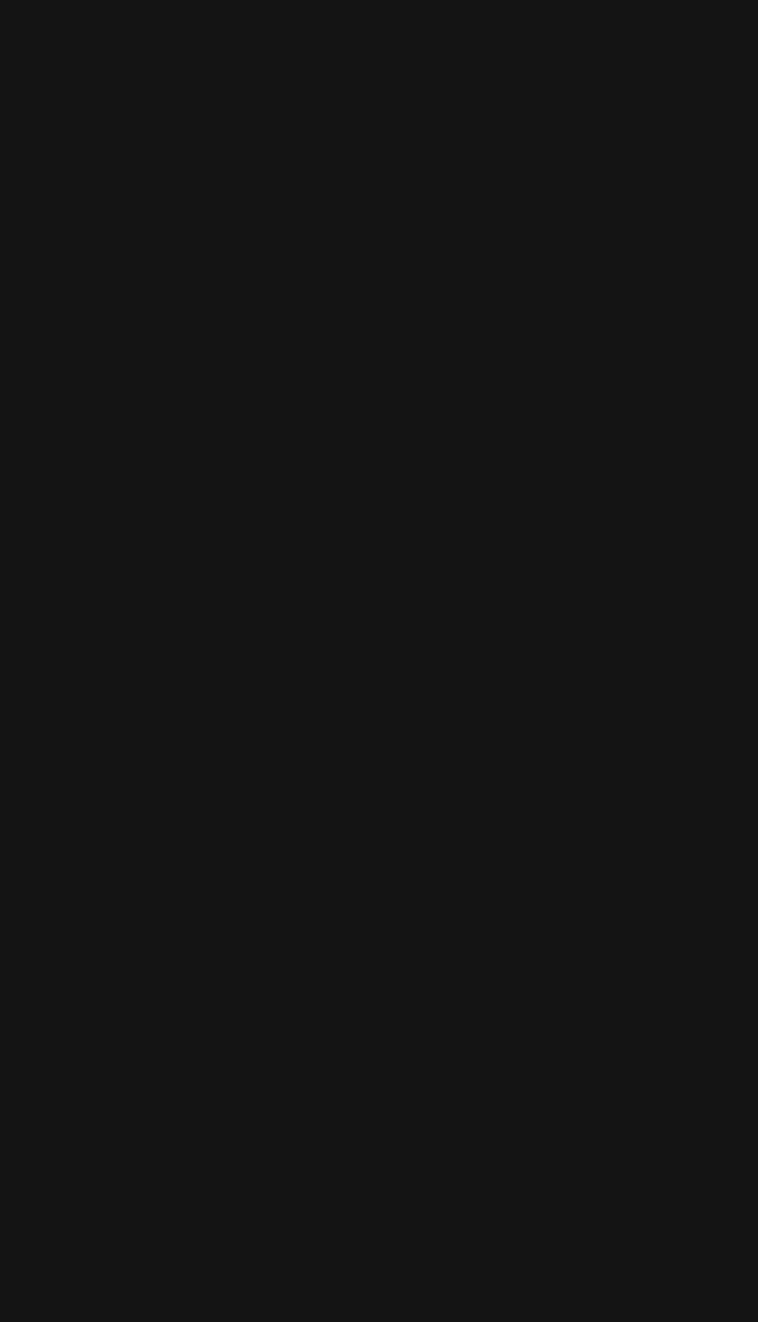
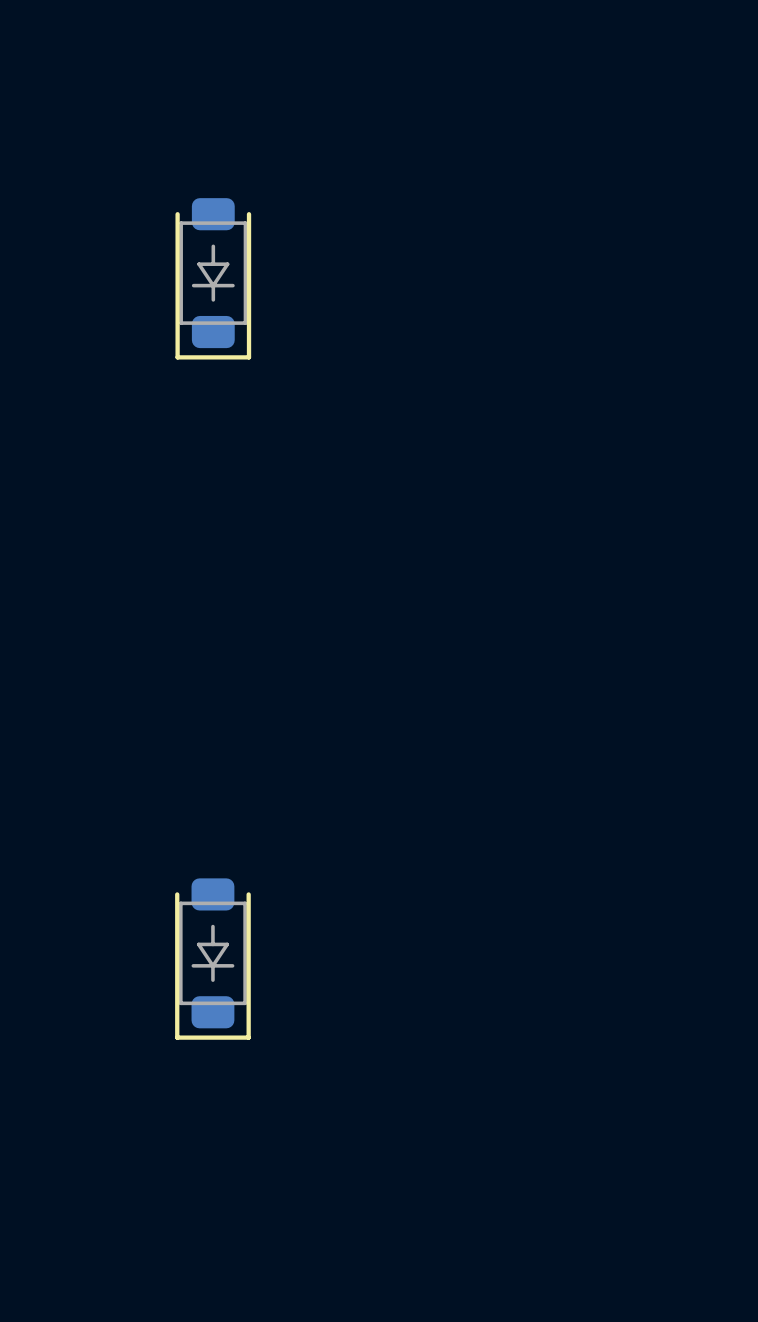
part: none -> (213, 278)
part: none -> (212, 959)

